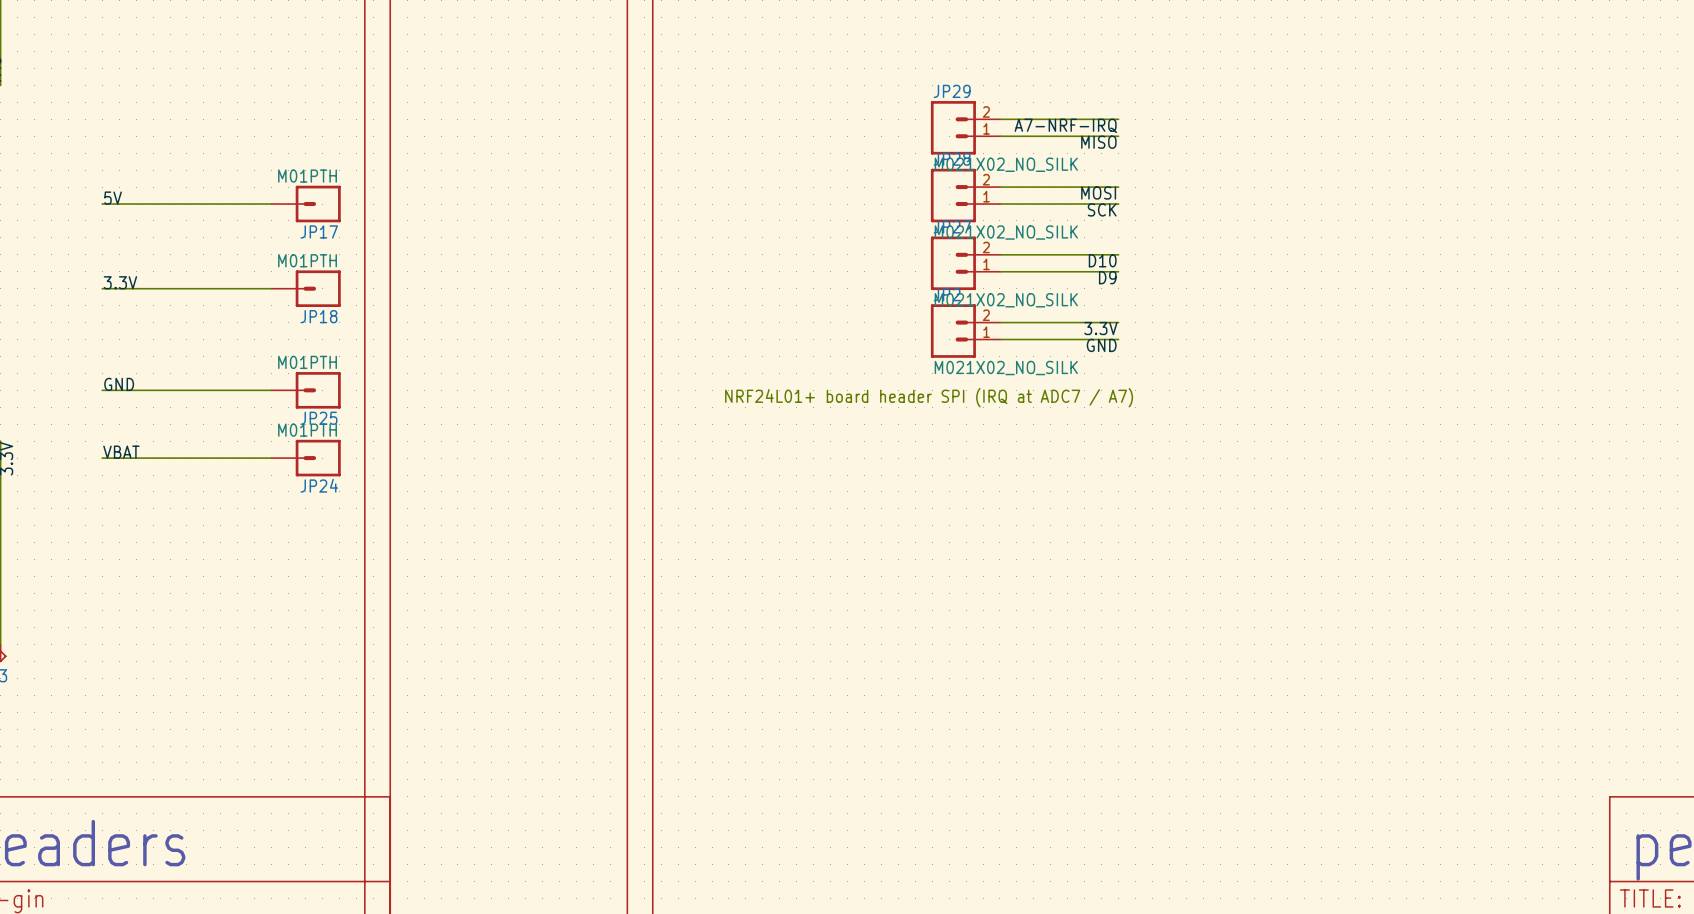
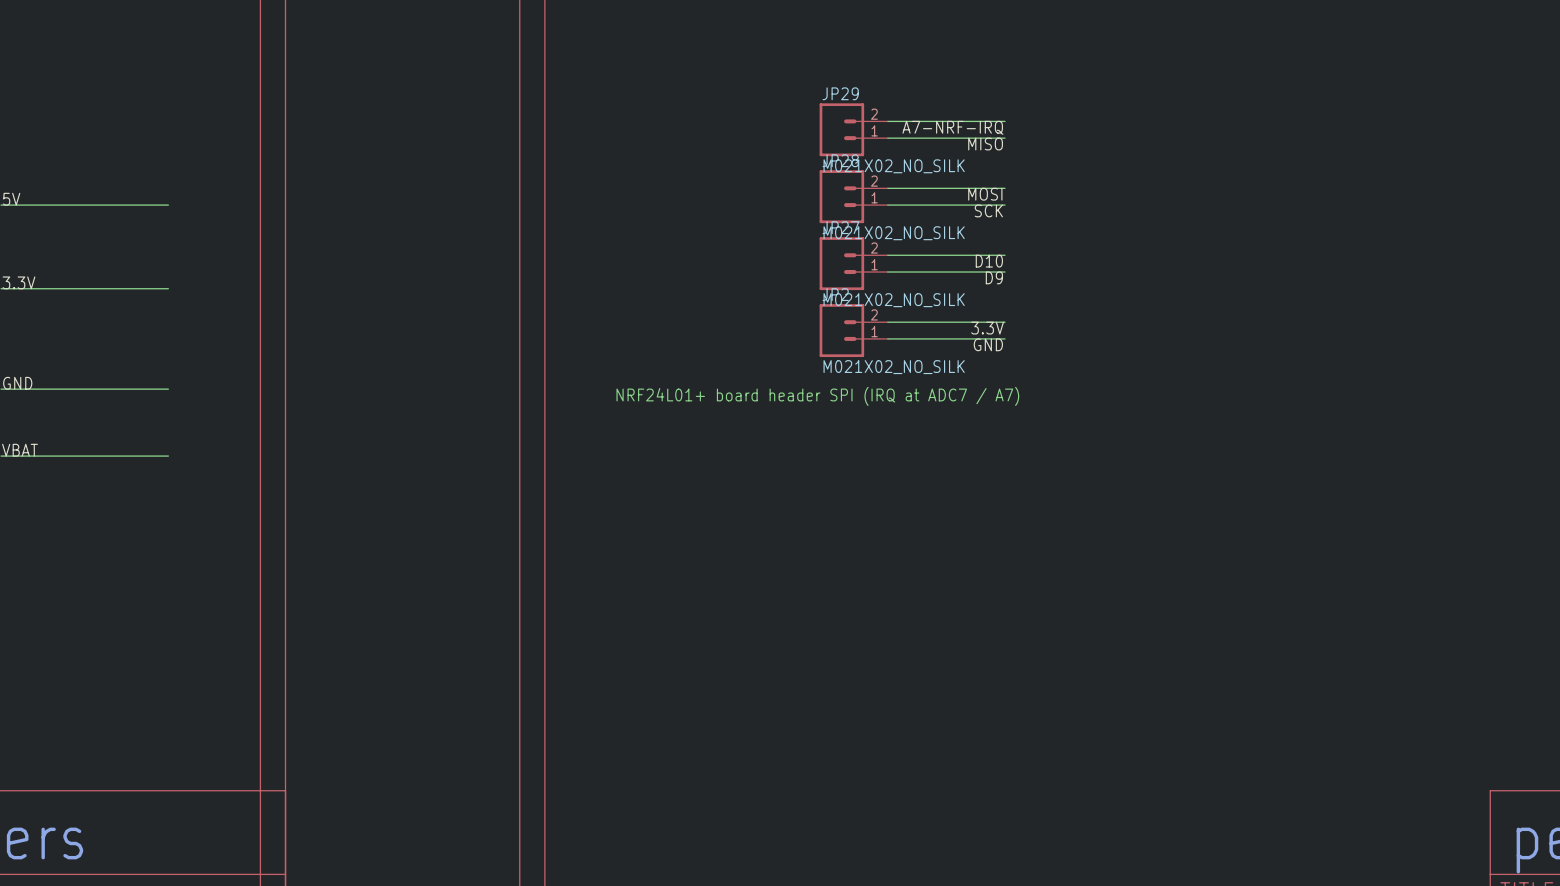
JP17: M01PTH (306, 204) -> none
JP18: M01PTH (306, 288) -> none
JP25: M01PTH (306, 390) -> none
JP24: M01PTH (306, 458) -> none

